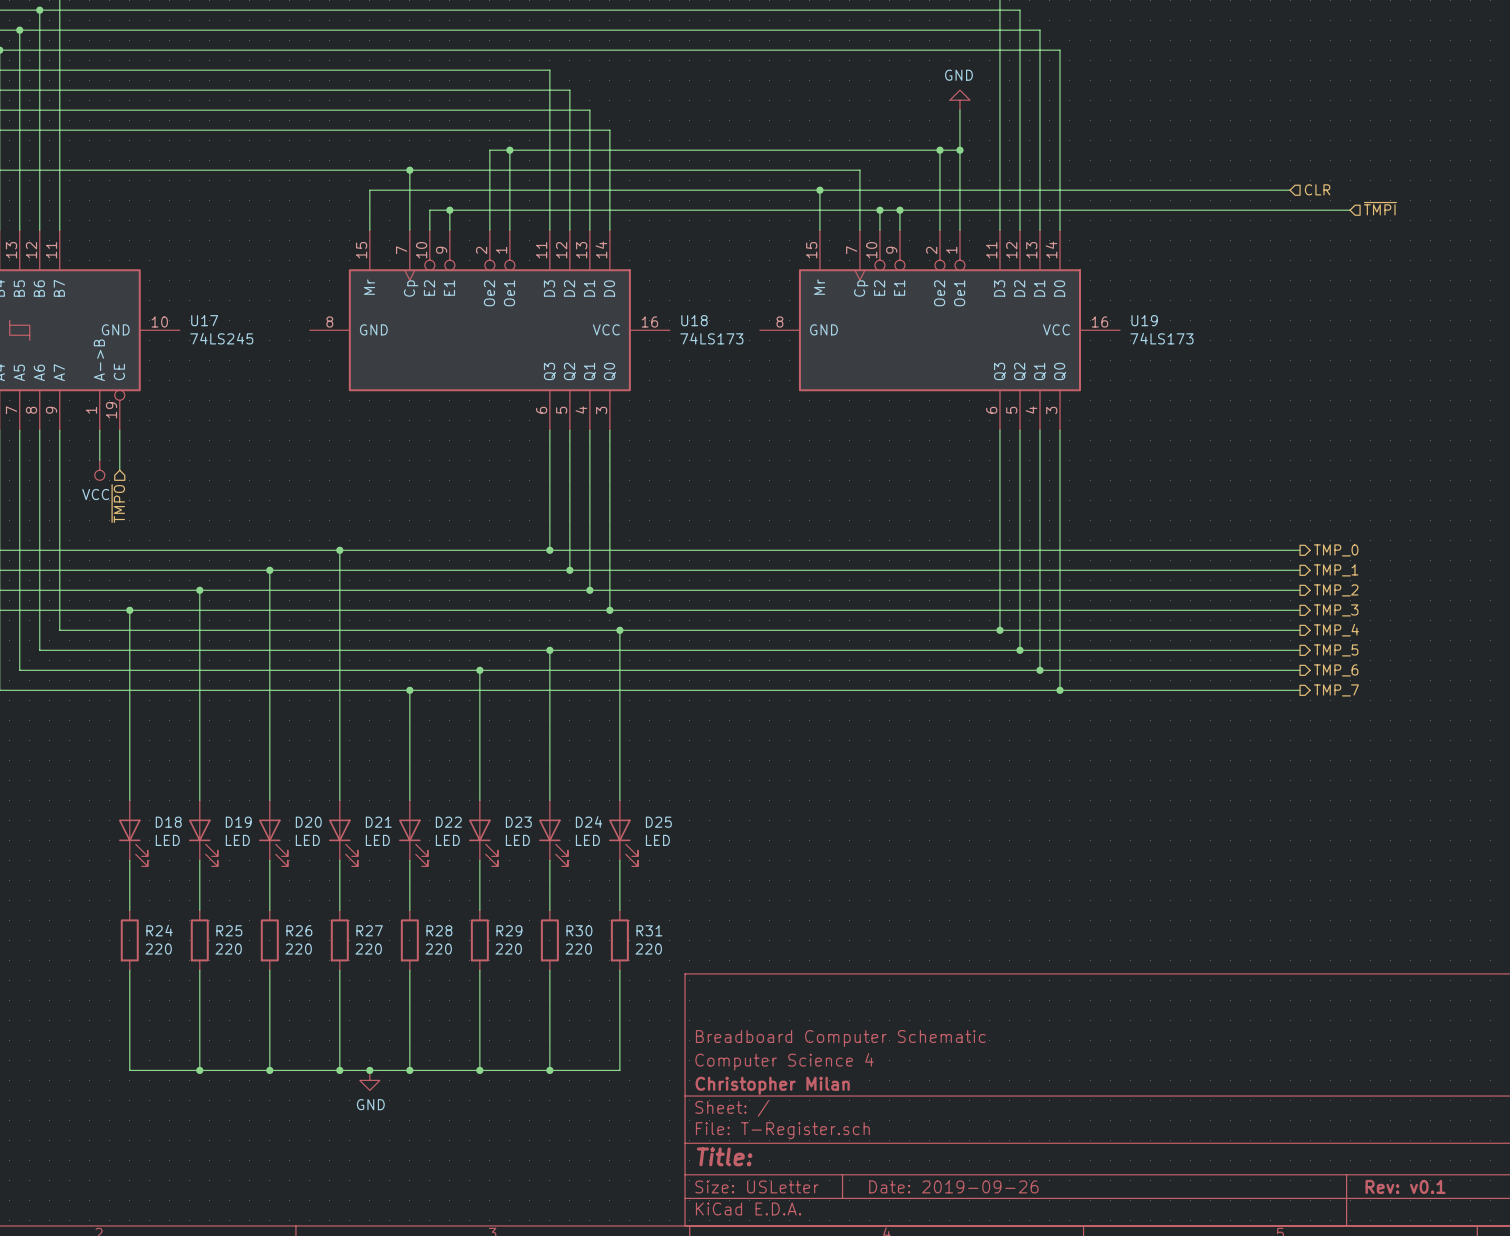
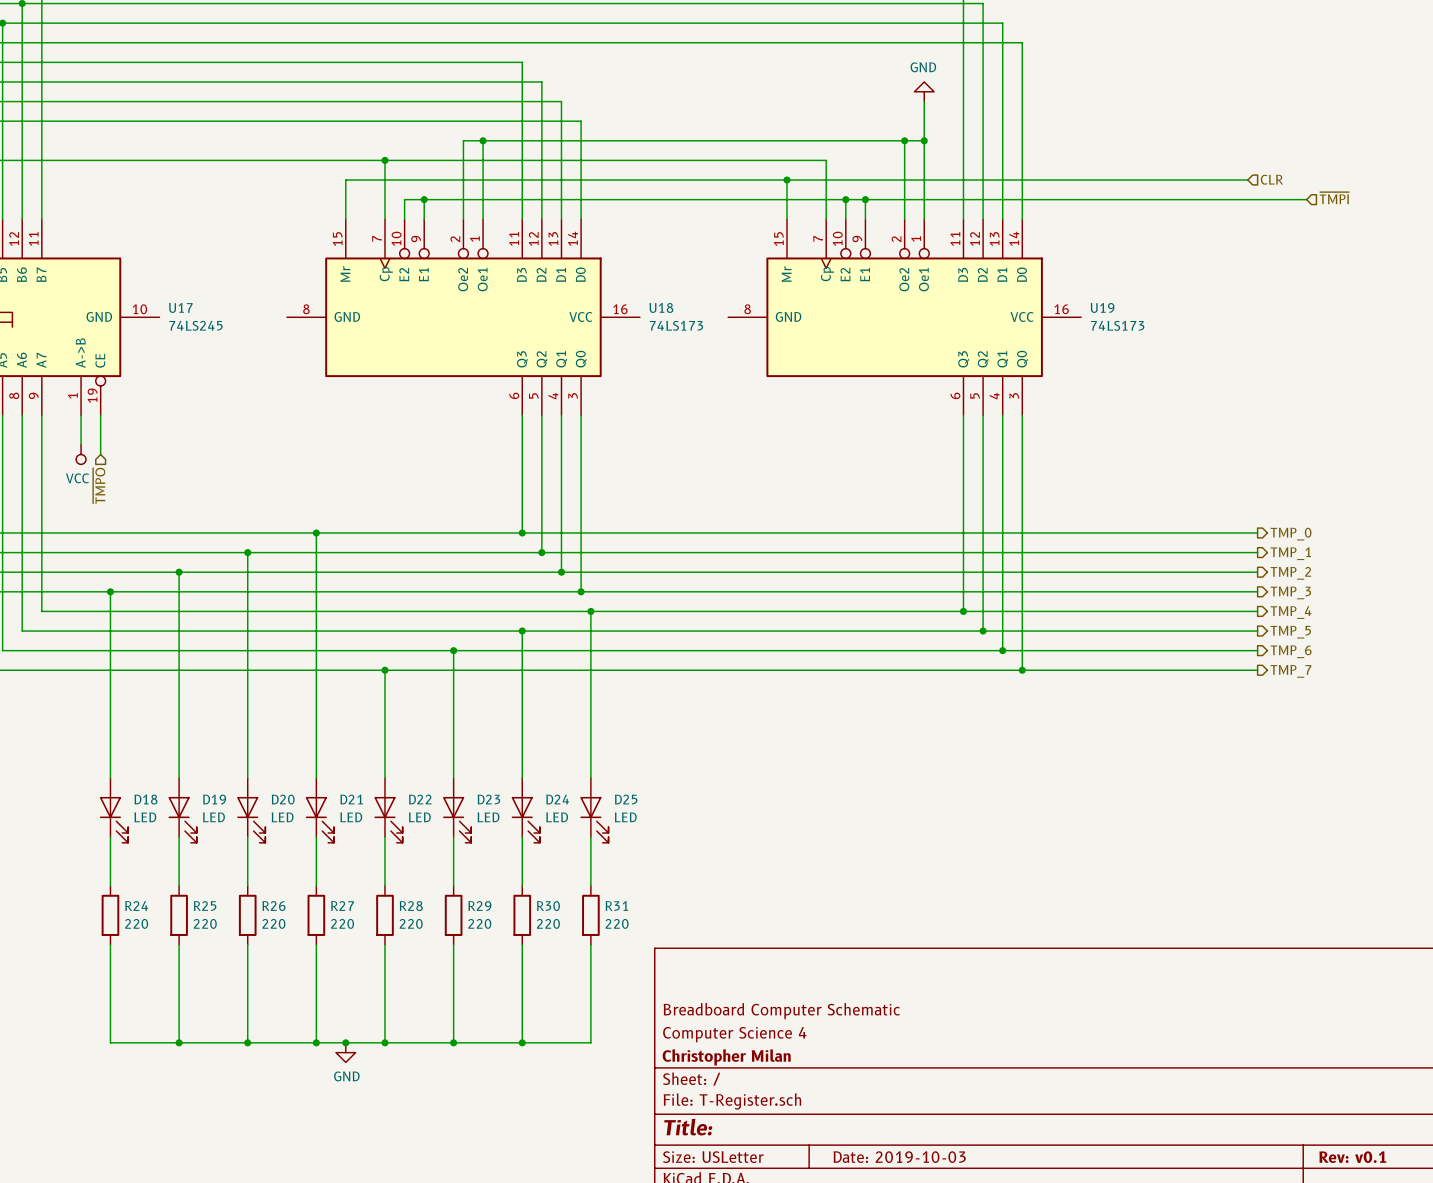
title block: Date: 2019-09-26 (953, 1186) -> Date: 2019-10-03 (899, 1157)

